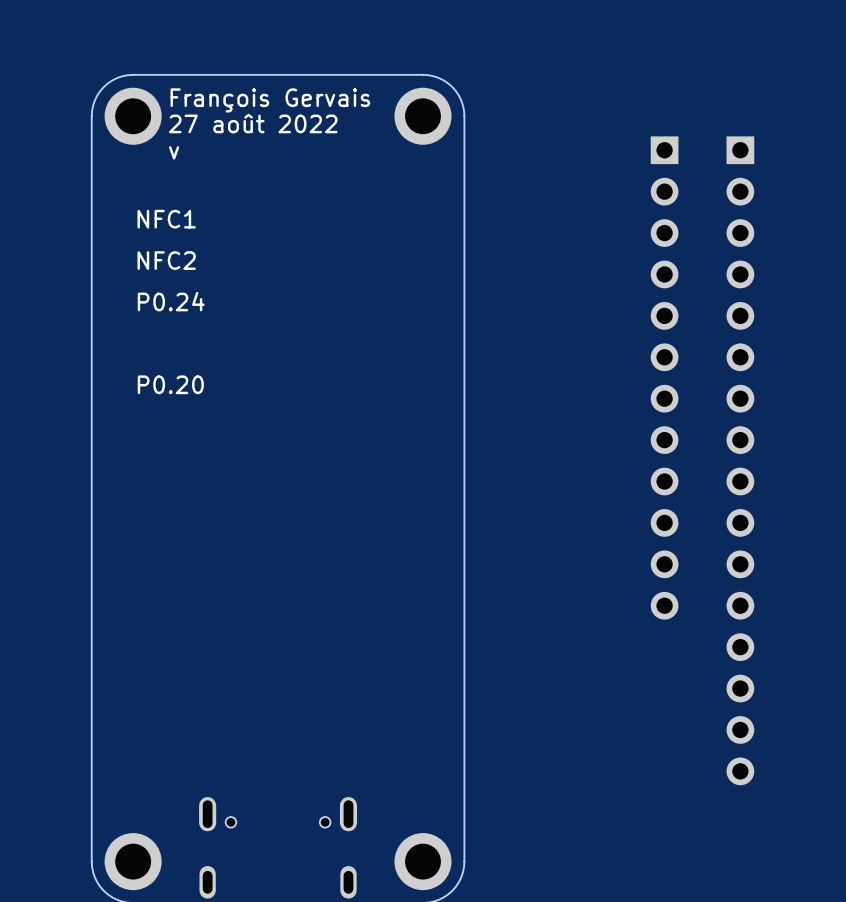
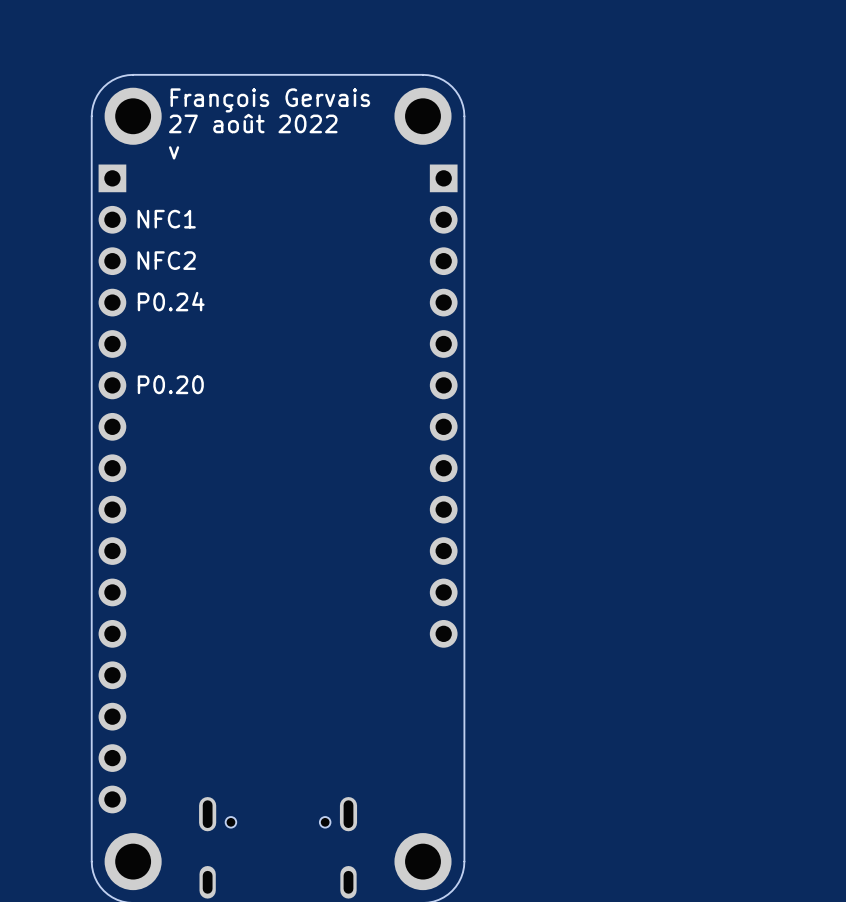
part position: (664, 377) -> (443, 406)
part: (740, 460) -> none
part: none -> (112, 488)

